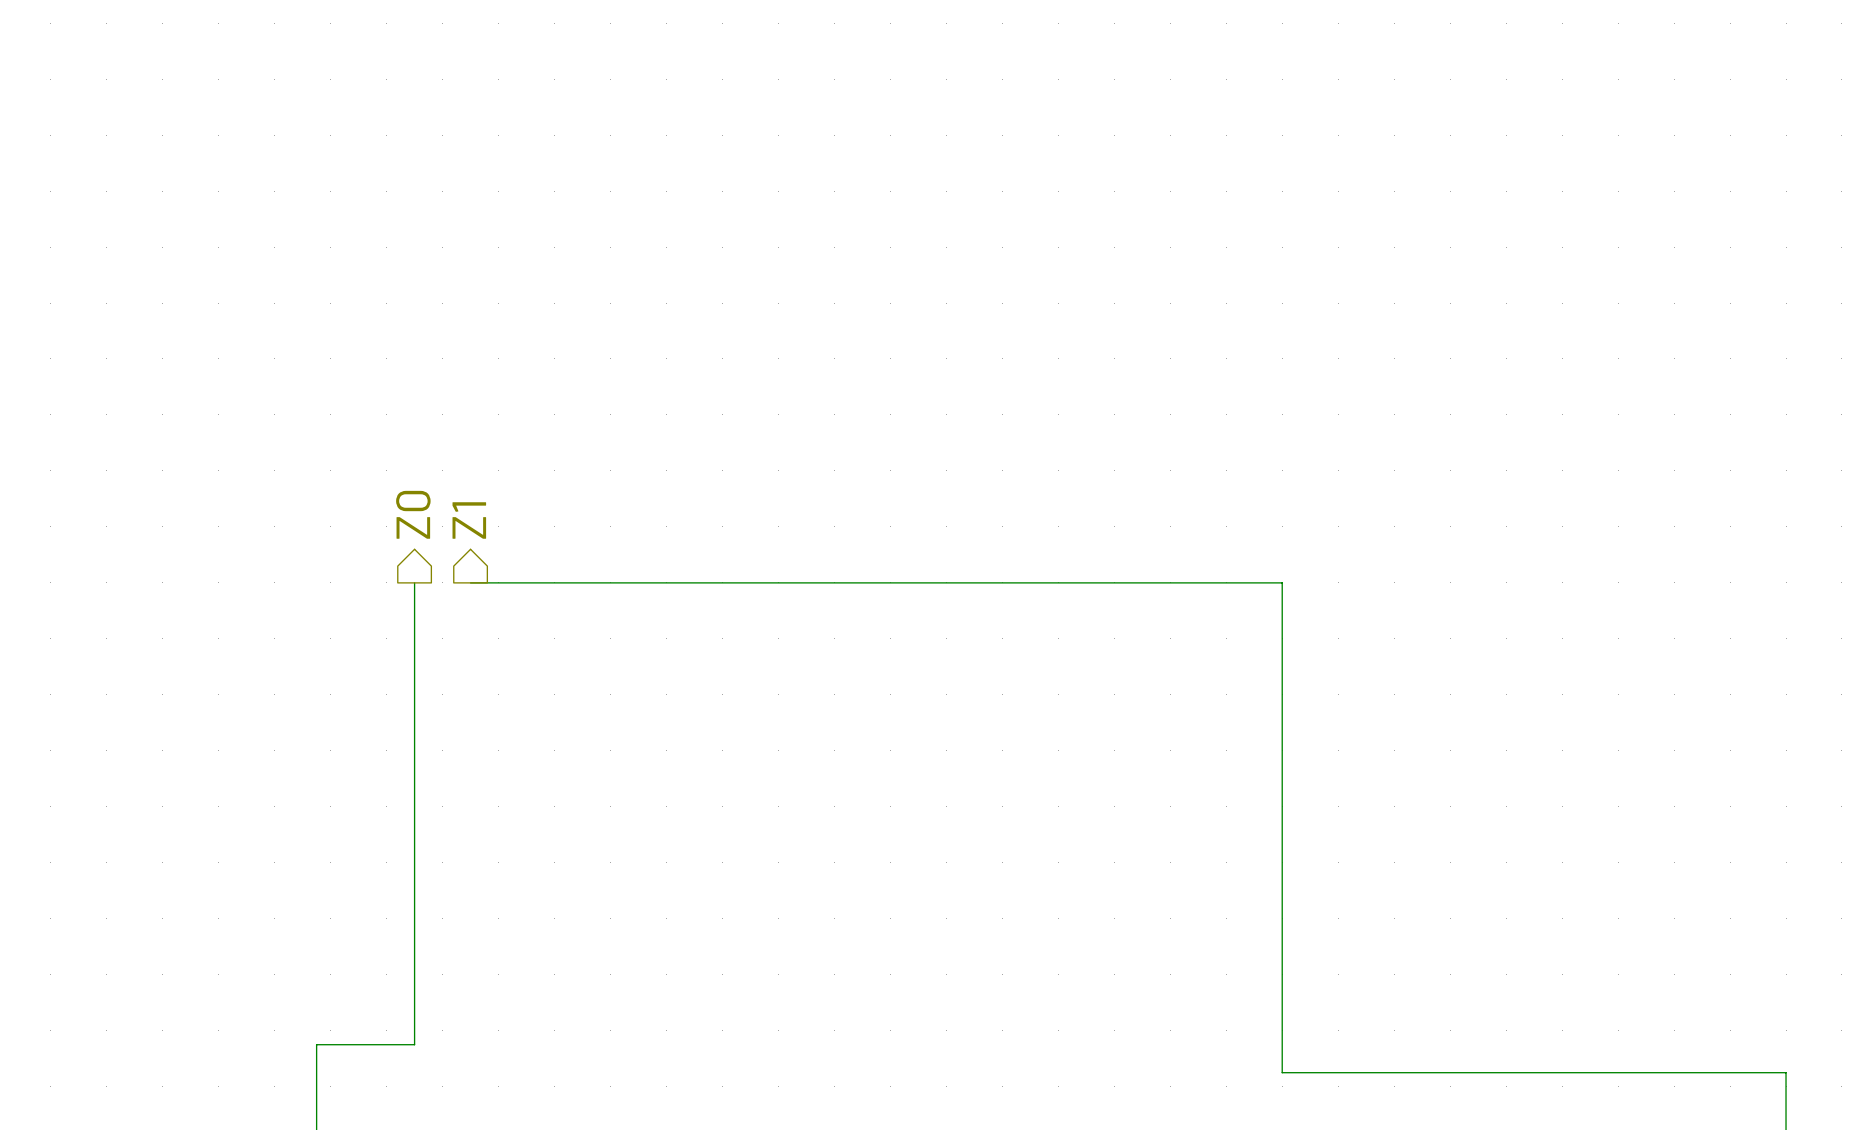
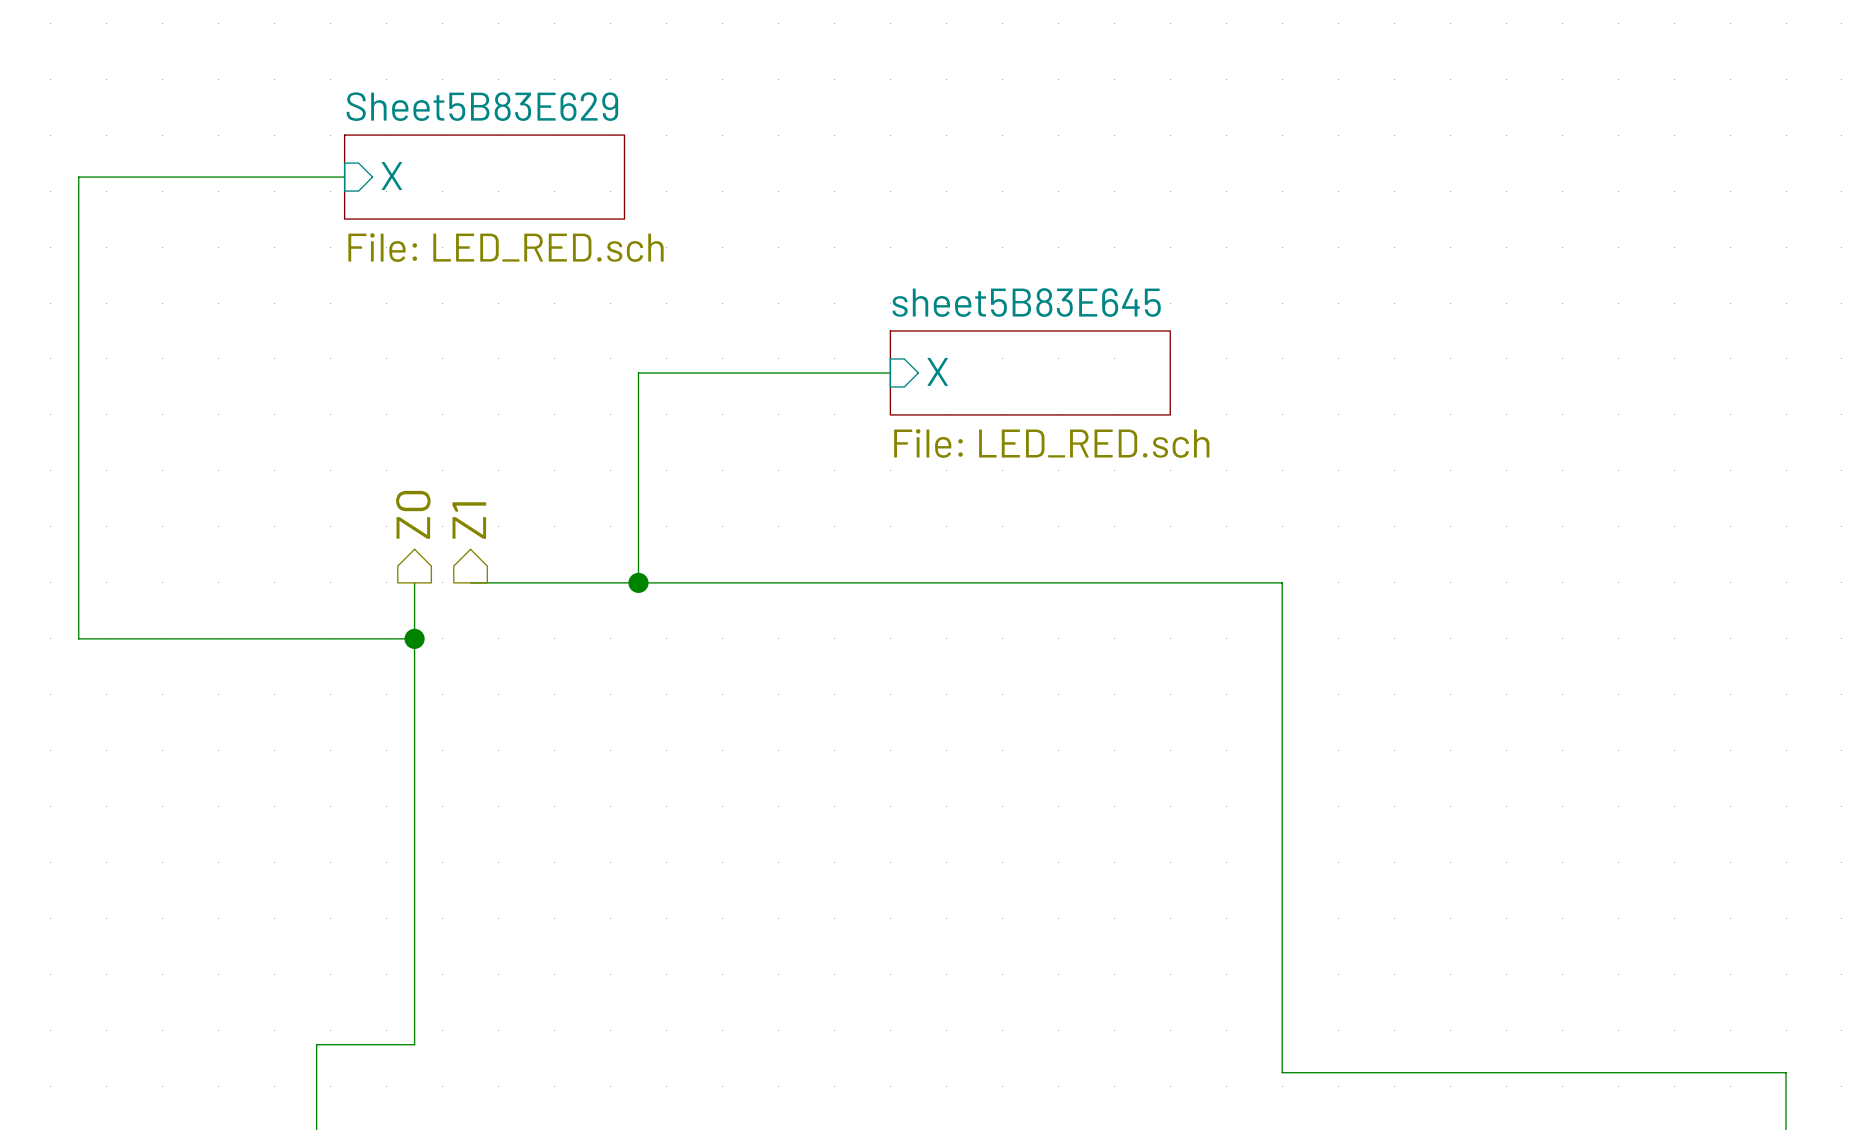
sheet pin: none -> X (391, 176)
wire: none -> (344, 177) (78, 177) (78, 638) (414, 638)
sheet Sheet5B83E629: none -> File: LED_RED.sch (484, 177)
sheet pin: none -> X (937, 371)
wire: none -> (890, 372) (638, 372) (638, 582)
sheet sheet5B83E645: none -> File: LED_RED.sch (1030, 372)
junction: none -> (638, 582)
junction: none -> (414, 638)

